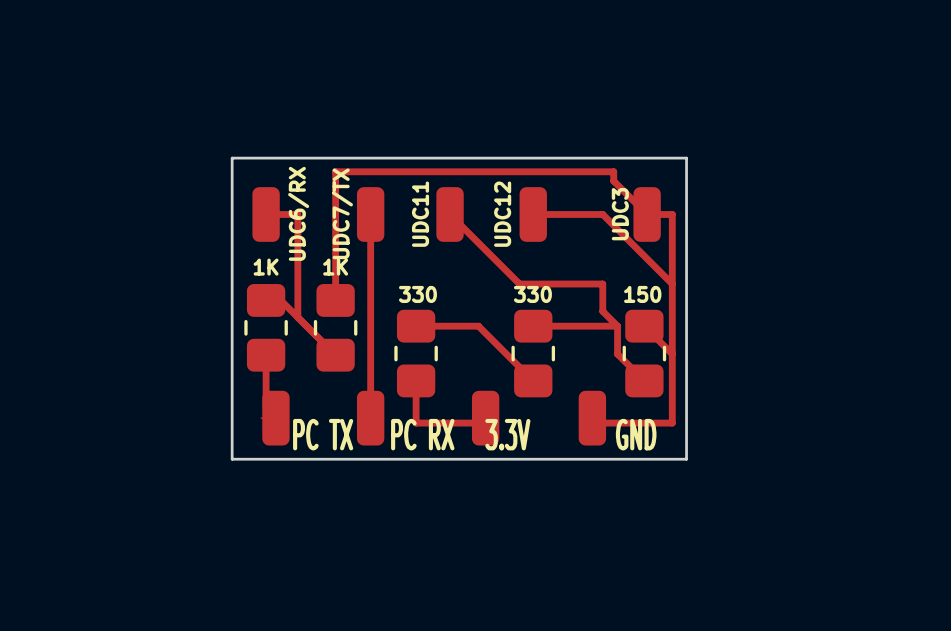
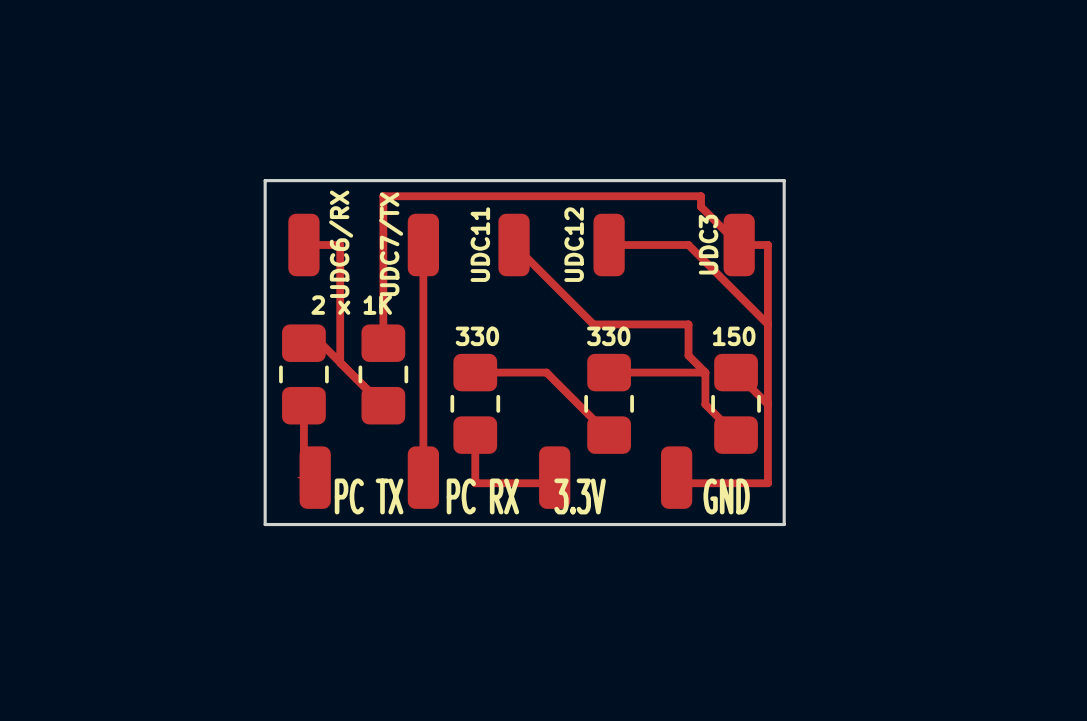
1K name: 1K (266, 267) -> none
1K name: 1K (335, 267) -> 2 x 1K (351, 305)

